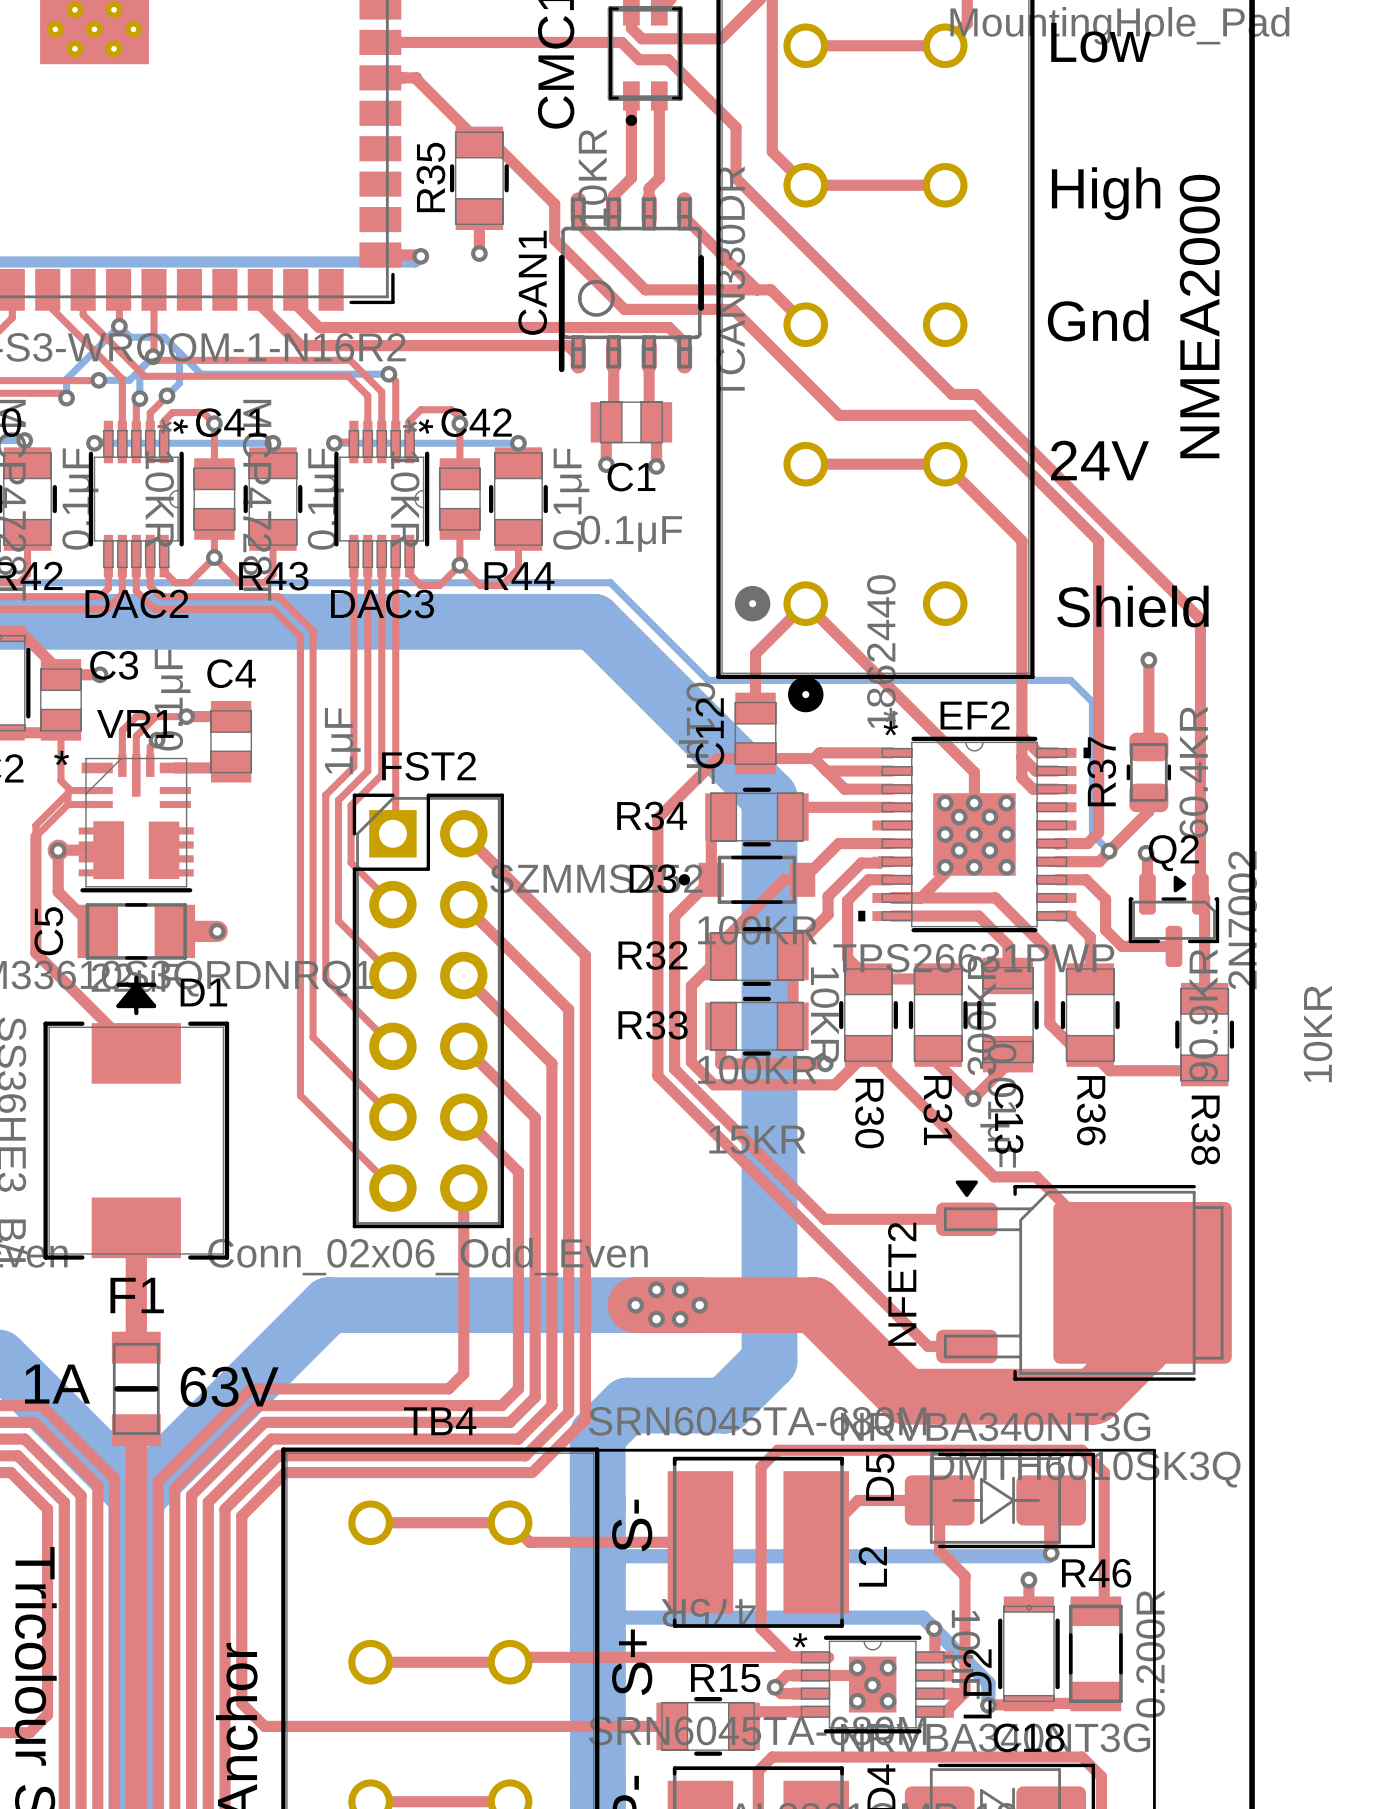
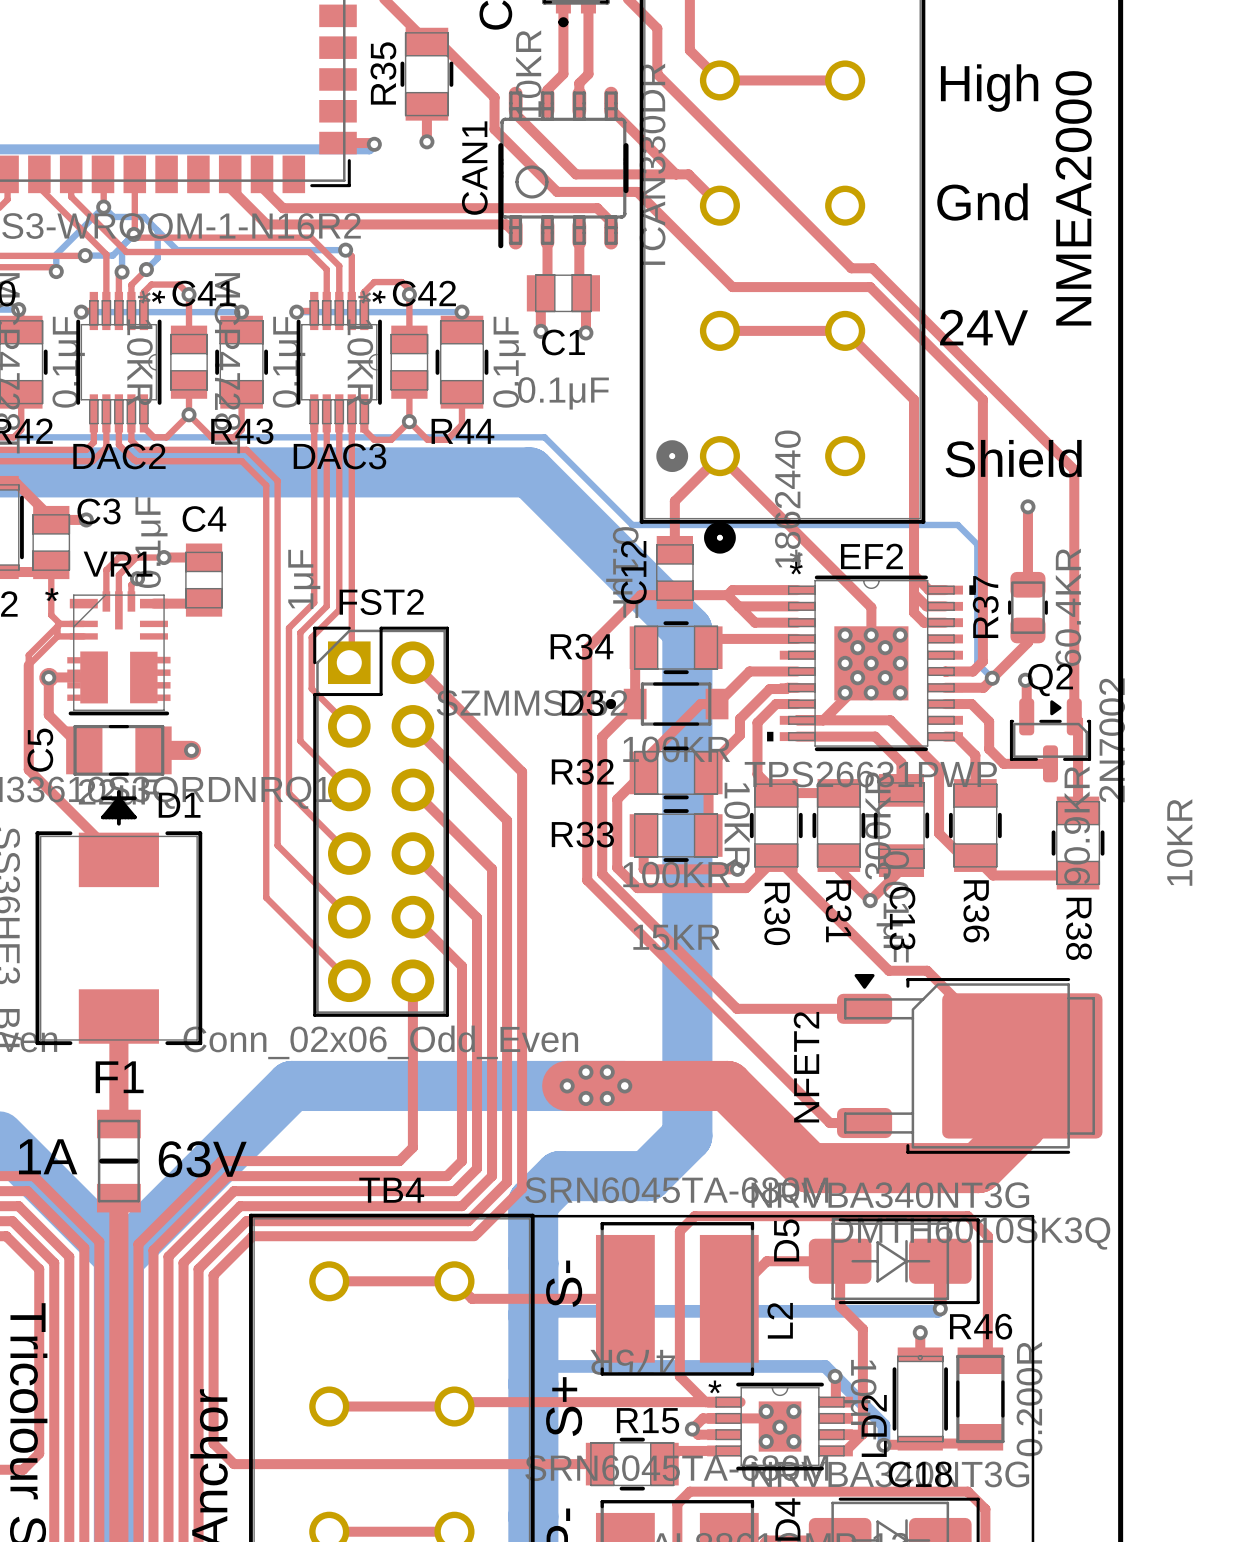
top track: (713, 309) (733, 309) (839, 415) -> (637, 191) (732, 287) (749, 287)

